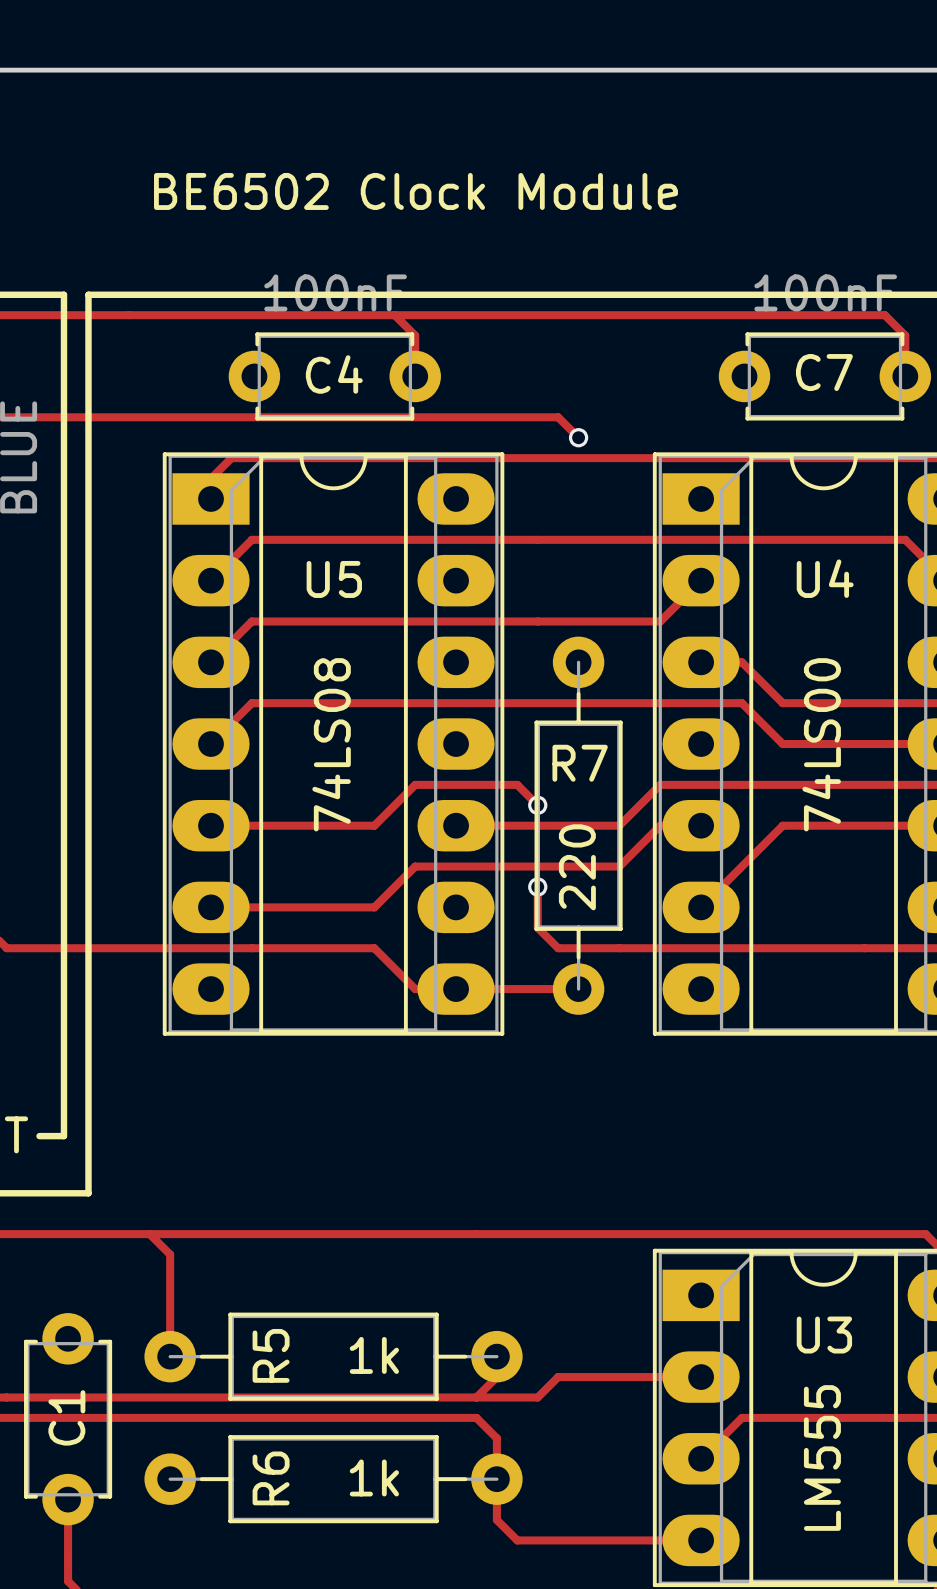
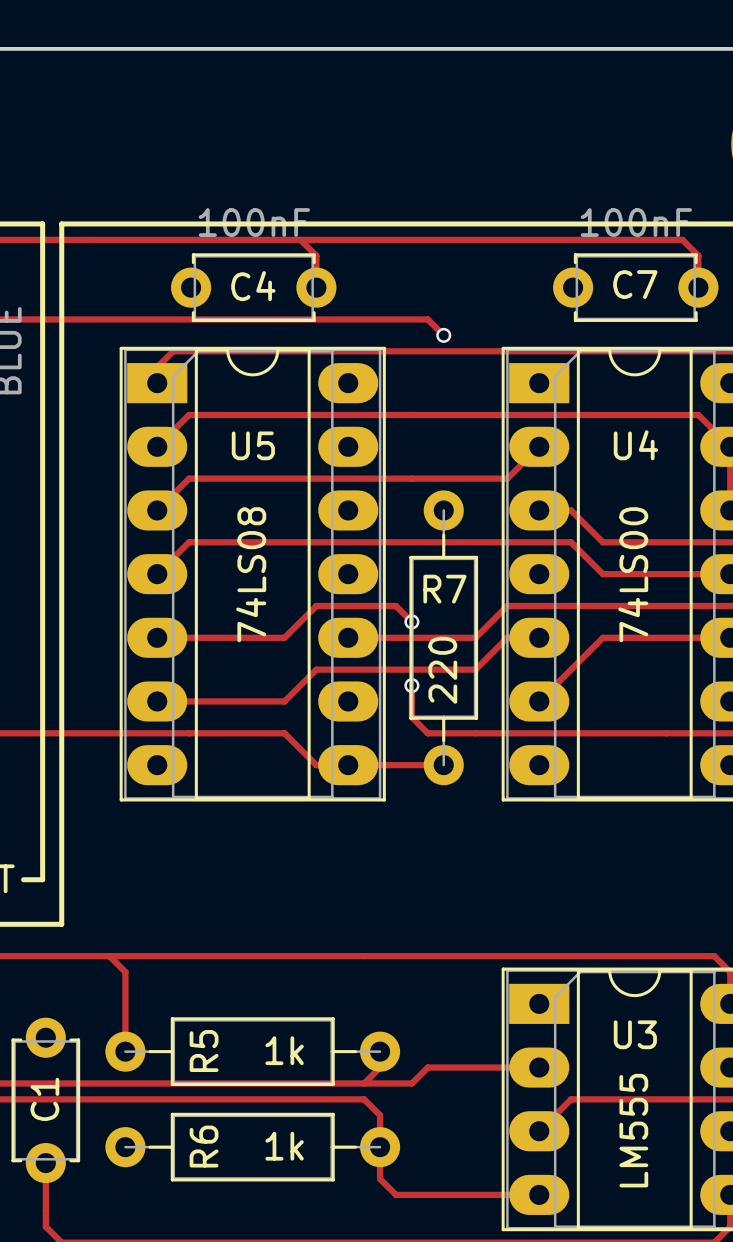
text: BE6502 Clock Module (415, 191) -> none

